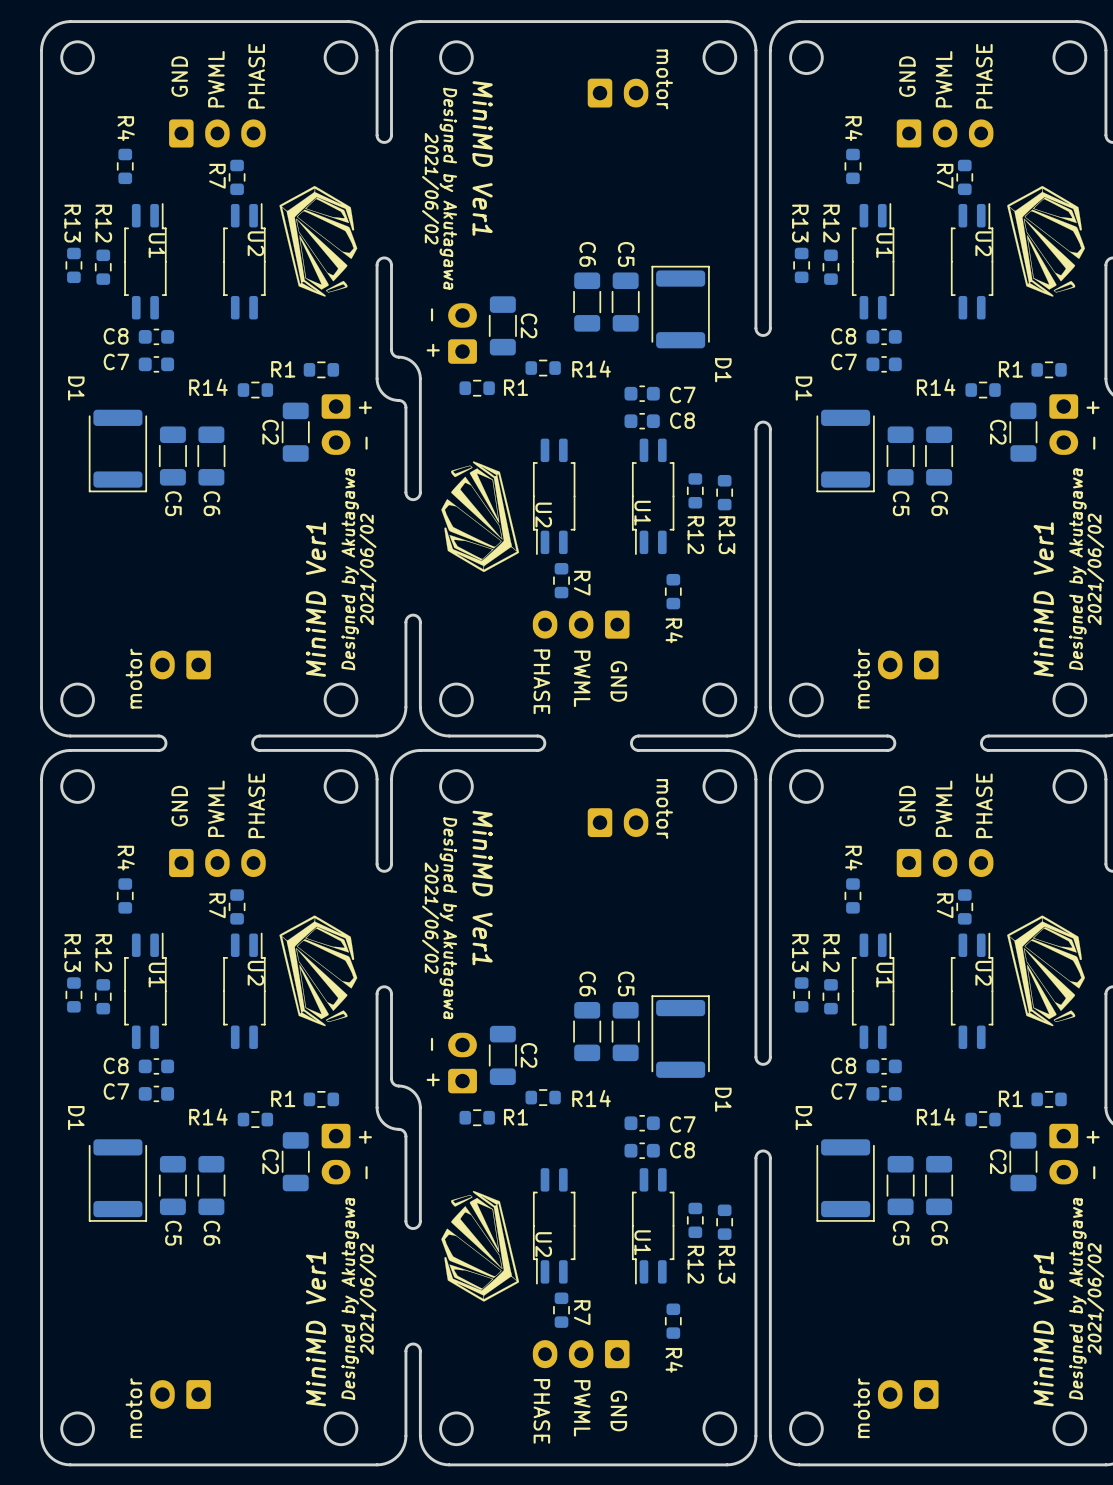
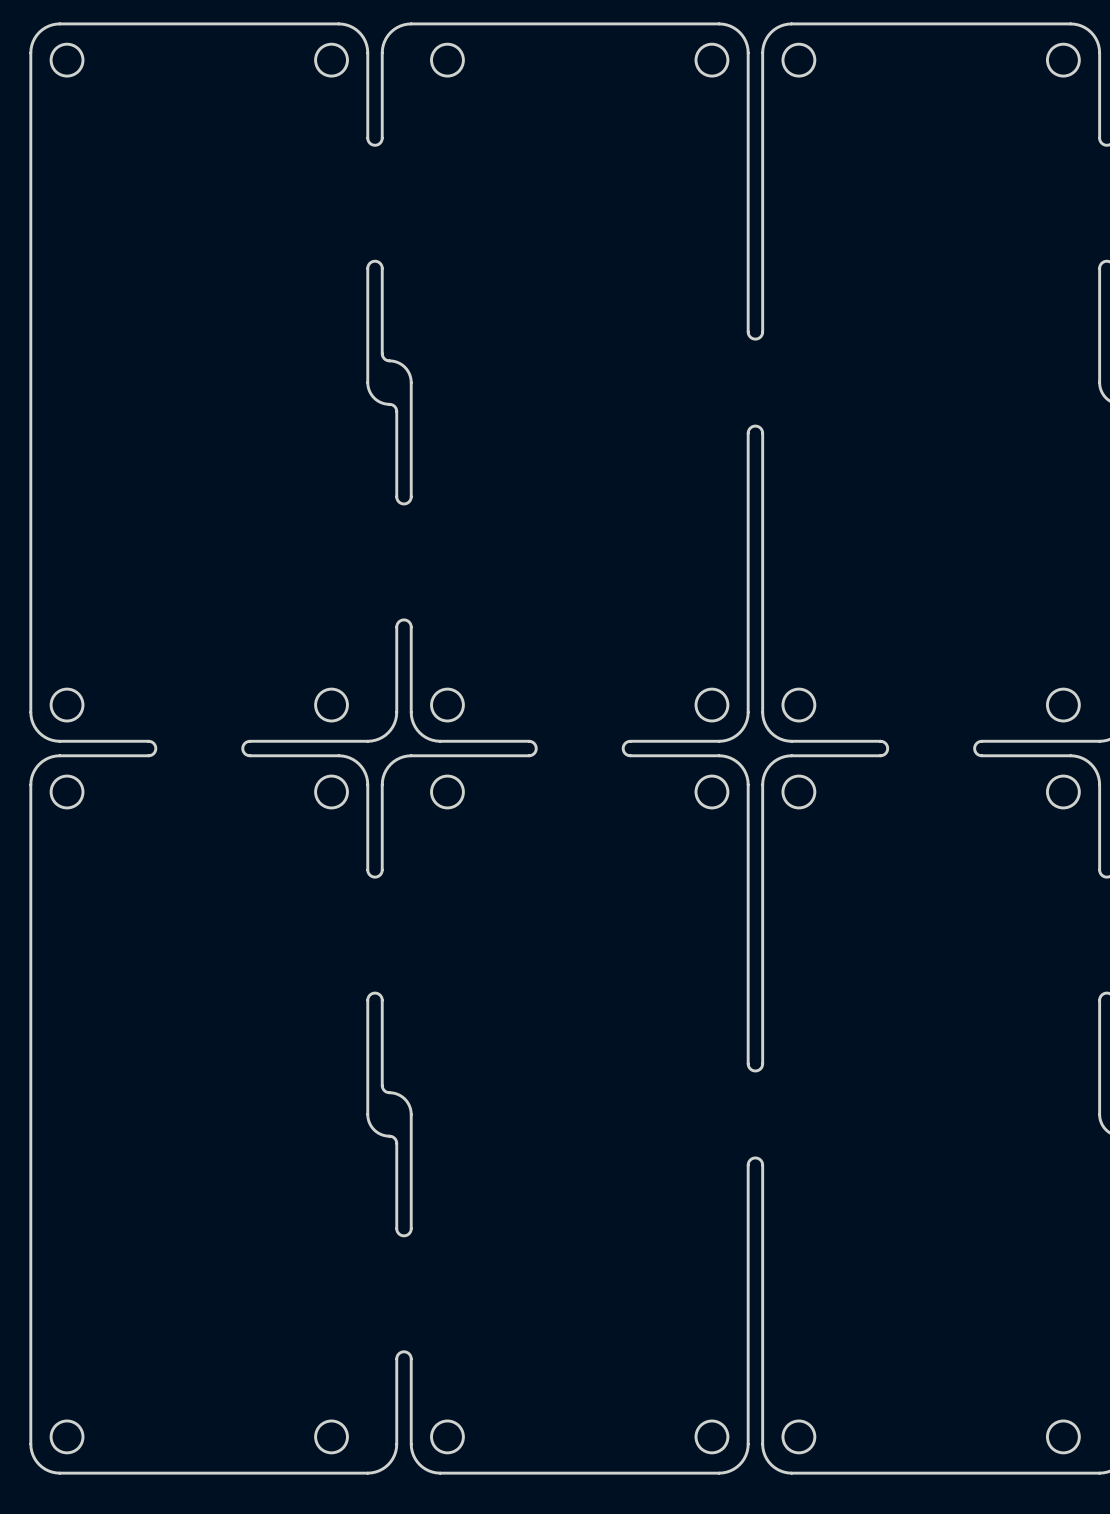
text: GND (179, 76) -> none
text: PHASE (256, 76) -> none
text: GND (907, 76) -> none
text: PHASE (984, 76) -> none
text: PWML (216, 79) -> none
text: motor (664, 79) -> none
text: PWML (944, 79) -> none
part: (618, 93) -> none
part: (217, 133) -> none
part: (945, 133) -> none
text: MiniMD Ver1 (482, 158) -> none
R4: (125, 166) -> none
R4: (852, 166) -> none
R7: (237, 177) -> none
R7: (964, 177) -> none
drawing: [279, 186, 358, 297] -> none
drawing: [1007, 186, 1085, 297] -> none
text: 2021/06/02 (430, 188) -> none
text: Designed by Akutagawa (448, 188) -> none
U1: (145, 261) -> none
U2: (244, 261) -> none
U1: (873, 261) -> none
U2: (972, 261) -> none
R13: (73, 265) -> none
R13: (801, 265) -> none
R12: (103, 267) -> none
R12: (830, 267) -> none
C6: (587, 302) -> none
C5: (625, 302) -> none
D1: (680, 307) -> none
text: - (432, 314) -> none
C2: (502, 325) -> none
part: (462, 333) -> none
C8: (156, 336) -> none
C8: (884, 336) -> none
text: + (433, 350) -> none
C7: (156, 364) -> none
C7: (884, 364) -> none
R14: (543, 368) -> none
R1: (321, 369) -> none
R1: (1049, 369) -> none
R1: (477, 388) -> none
R14: (255, 390) -> none
R14: (983, 390) -> none
C7: (642, 393) -> none
text: + (365, 407) -> none
text: + (1093, 407) -> none
C8: (642, 421) -> none
part: (336, 424) -> none
part: (1063, 424) -> none
C2: (295, 432) -> none
C2: (1023, 432) -> none
text: - (366, 443) -> none
text: - (1094, 443) -> none
D1: (117, 451) -> none
D1: (845, 451) -> none
C5: (172, 456) -> none
C6: (211, 456) -> none
C5: (900, 456) -> none
C6: (939, 456) -> none
drawing: [441, 461, 520, 573] -> none
R12: (695, 490) -> none
R13: (724, 492) -> none
U2: (554, 496) -> none
U1: (653, 496) -> none
text: Designed by Akutagawa (350, 569) -> none
text: 2021/06/02 (368, 569) -> none
text: Designed by Akutagawa (1077, 569) -> none
text: 2021/06/02 (1095, 569) -> none
R7: (561, 580) -> none
R4: (673, 591) -> none
text: MiniMD Ver1 (315, 599) -> none
text: MiniMD Ver1 (1043, 599) -> none
part: (581, 624) -> none
part: (180, 664) -> none
part: (908, 664) -> none
text: motor (133, 678) -> none
text: PWML (582, 678) -> none
text: motor (861, 678) -> none
text: PHASE (541, 681) -> none
text: GND (618, 681) -> none
text: PHASE (256, 805) -> none
text: PHASE (984, 805) -> none
text: GND (179, 806) -> none
text: GND (907, 806) -> none
text: PWML (216, 808) -> none
text: motor (664, 808) -> none
text: PWML (944, 808) -> none
part: (618, 822) -> none
part: (217, 862) -> none
part: (945, 862) -> none
text: MiniMD Ver1 (482, 888) -> none
R4: (125, 895) -> none
R4: (852, 895) -> none
R7: (237, 906) -> none
R7: (964, 906) -> none
drawing: [279, 915, 358, 1027] -> none
drawing: [1007, 915, 1085, 1027] -> none
text: 2021/06/02 (430, 918) -> none
text: Designed by Akutagawa (448, 918) -> none
U1: (145, 990) -> none
U2: (244, 990) -> none
U1: (873, 990) -> none
U2: (972, 990) -> none
R13: (73, 994) -> none
R13: (801, 994) -> none
R12: (103, 996) -> none
R12: (830, 996) -> none
C6: (587, 1031) -> none
C5: (625, 1031) -> none
D1: (680, 1036) -> none
text: - (432, 1044) -> none
C2: (502, 1055) -> none
part: (462, 1063) -> none
C8: (156, 1066) -> none
C8: (884, 1066) -> none
text: + (433, 1079) -> none
C7: (156, 1093) -> none
C7: (884, 1093) -> none
R14: (543, 1097) -> none
R1: (321, 1099) -> none
R1: (1049, 1099) -> none
R1: (477, 1117) -> none
R14: (255, 1119) -> none
R14: (983, 1119) -> none
C7: (642, 1123) -> none
text: + (365, 1137) -> none
text: + (1093, 1137) -> none
C8: (642, 1150) -> none
part: (336, 1154) -> none
part: (1063, 1154) -> none
C2: (295, 1161) -> none
C2: (1023, 1161) -> none
text: - (366, 1172) -> none
text: - (1094, 1172) -> none
D1: (117, 1180) -> none
D1: (845, 1180) -> none
C5: (172, 1185) -> none
C6: (211, 1185) -> none
C5: (900, 1185) -> none
C6: (939, 1185) -> none
drawing: [441, 1190, 520, 1302] -> none
R12: (695, 1220) -> none
R13: (724, 1222) -> none
U2: (554, 1226) -> none
U1: (653, 1226) -> none
text: Designed by Akutagawa (350, 1298) -> none
text: 2021/06/02 (368, 1298) -> none
text: Designed by Akutagawa (1077, 1298) -> none
text: 2021/06/02 (1095, 1298) -> none
R7: (561, 1310) -> none
R4: (673, 1321) -> none
text: MiniMD Ver1 (315, 1329) -> none
text: MiniMD Ver1 (1043, 1329) -> none
part: (581, 1354) -> none
part: (180, 1394) -> none
part: (908, 1394) -> none
text: motor (133, 1408) -> none
text: PWML (582, 1408) -> none
text: motor (861, 1408) -> none
text: PHASE (541, 1411) -> none
text: GND (618, 1411) -> none

